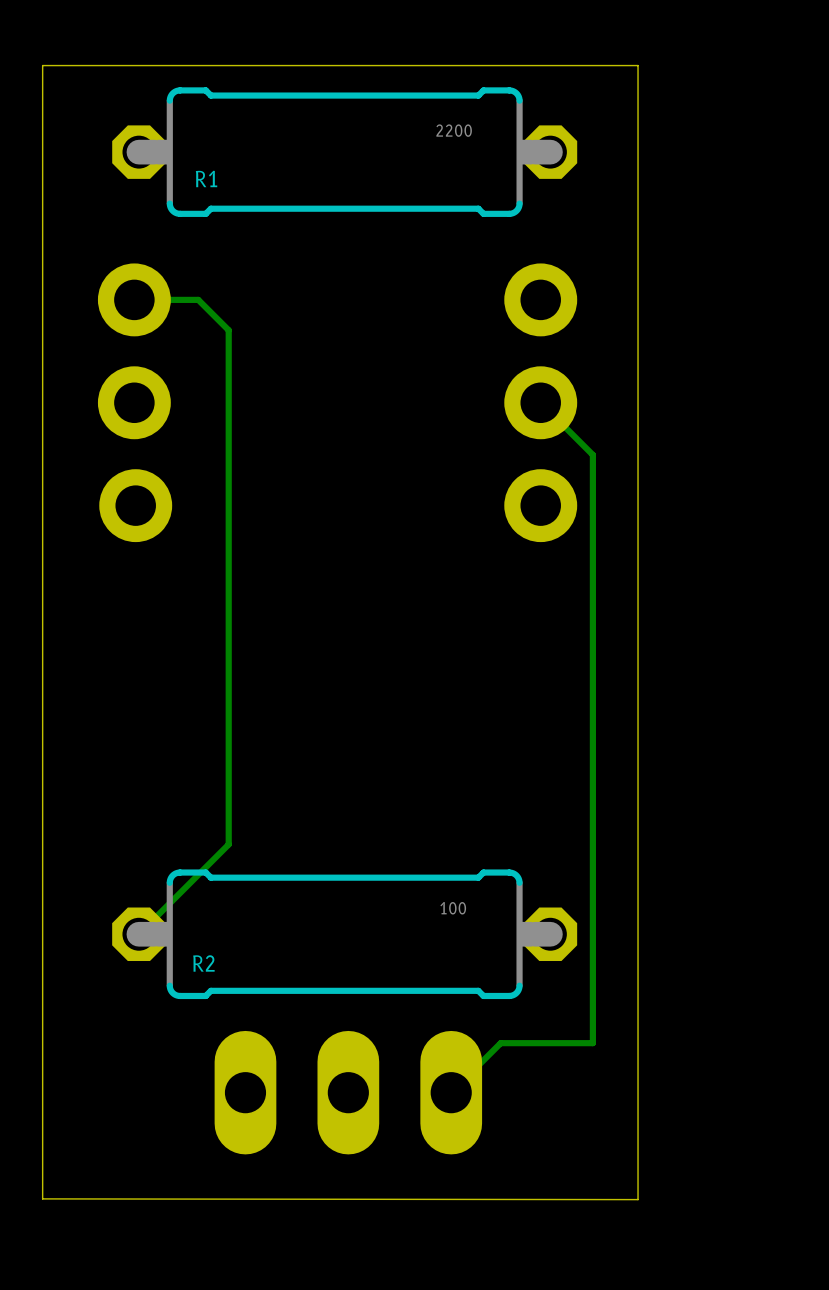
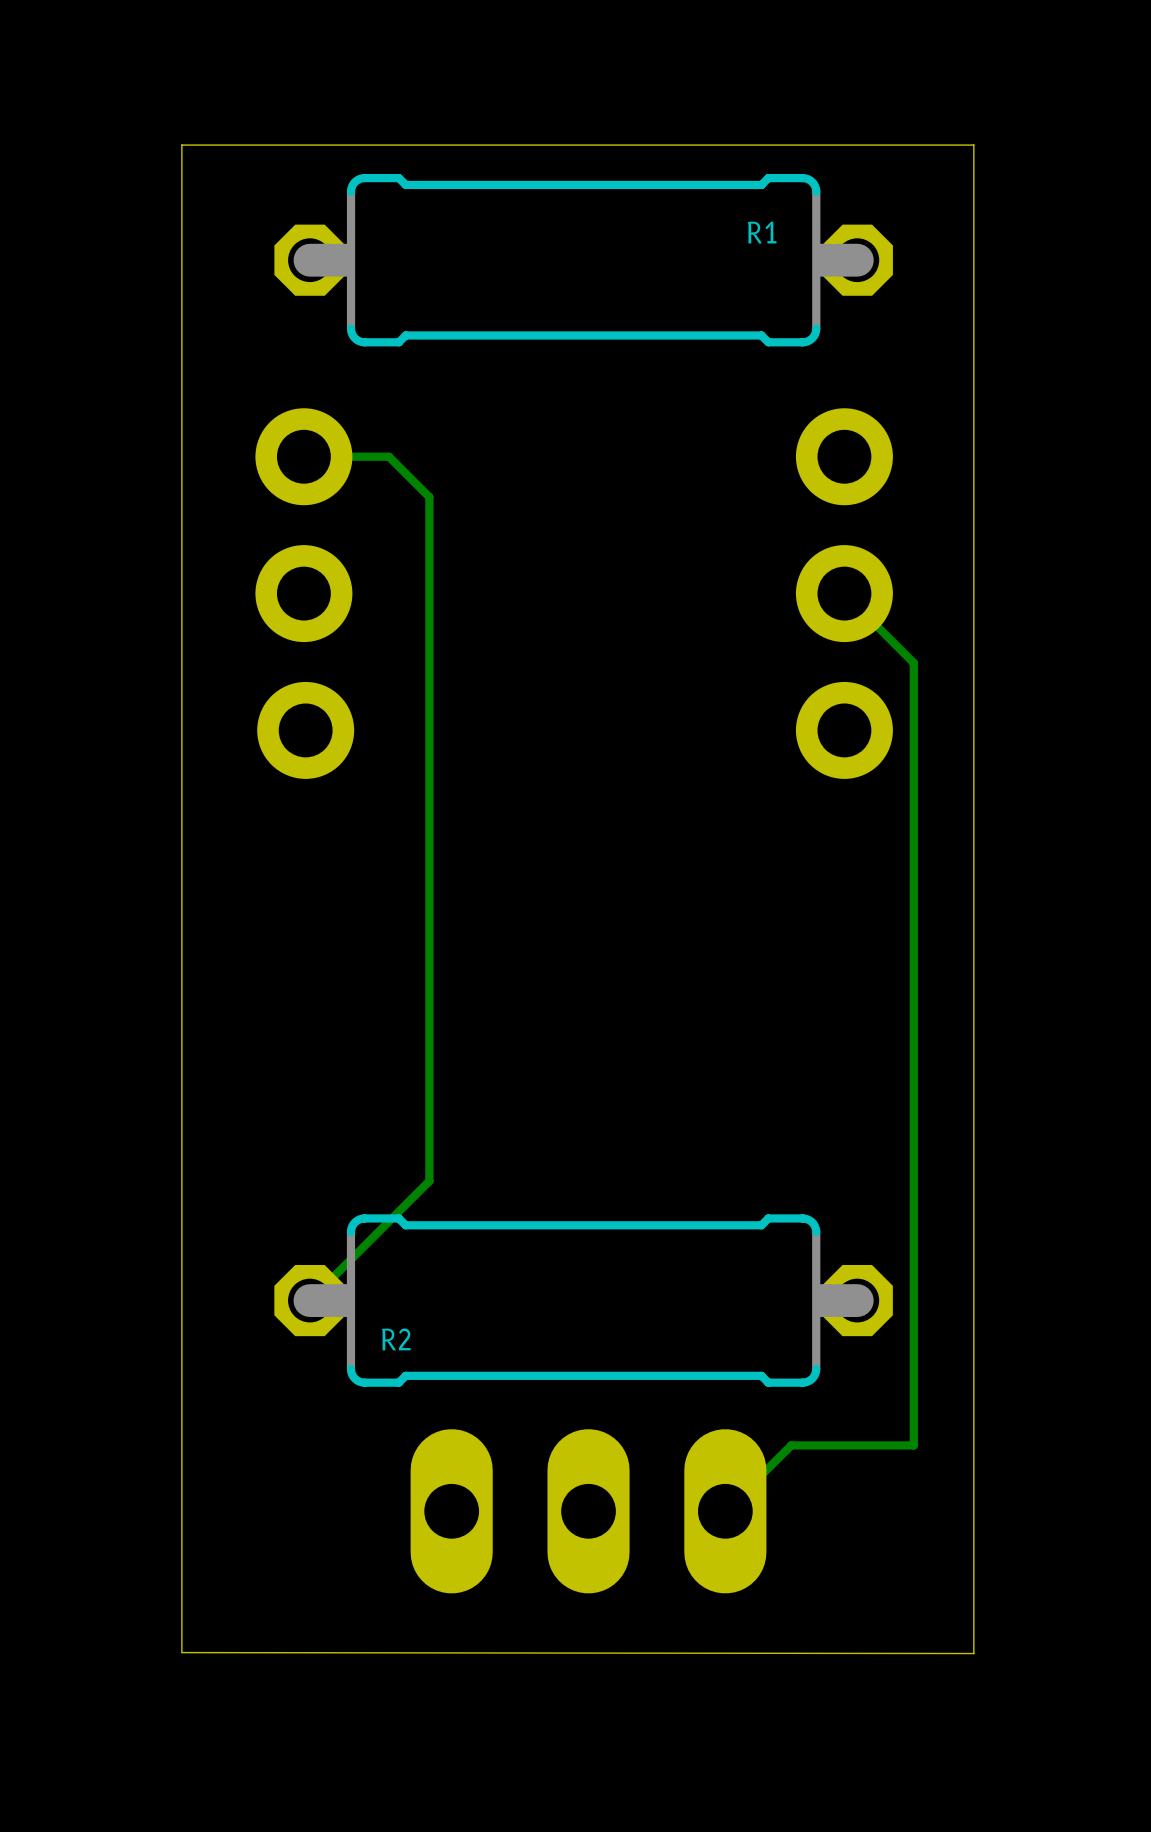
R1 value: 2200 (454, 130) -> none
R1 name position: R1 (206, 178) -> R1 (762, 232)
R2 value: 100 (453, 908) -> none

